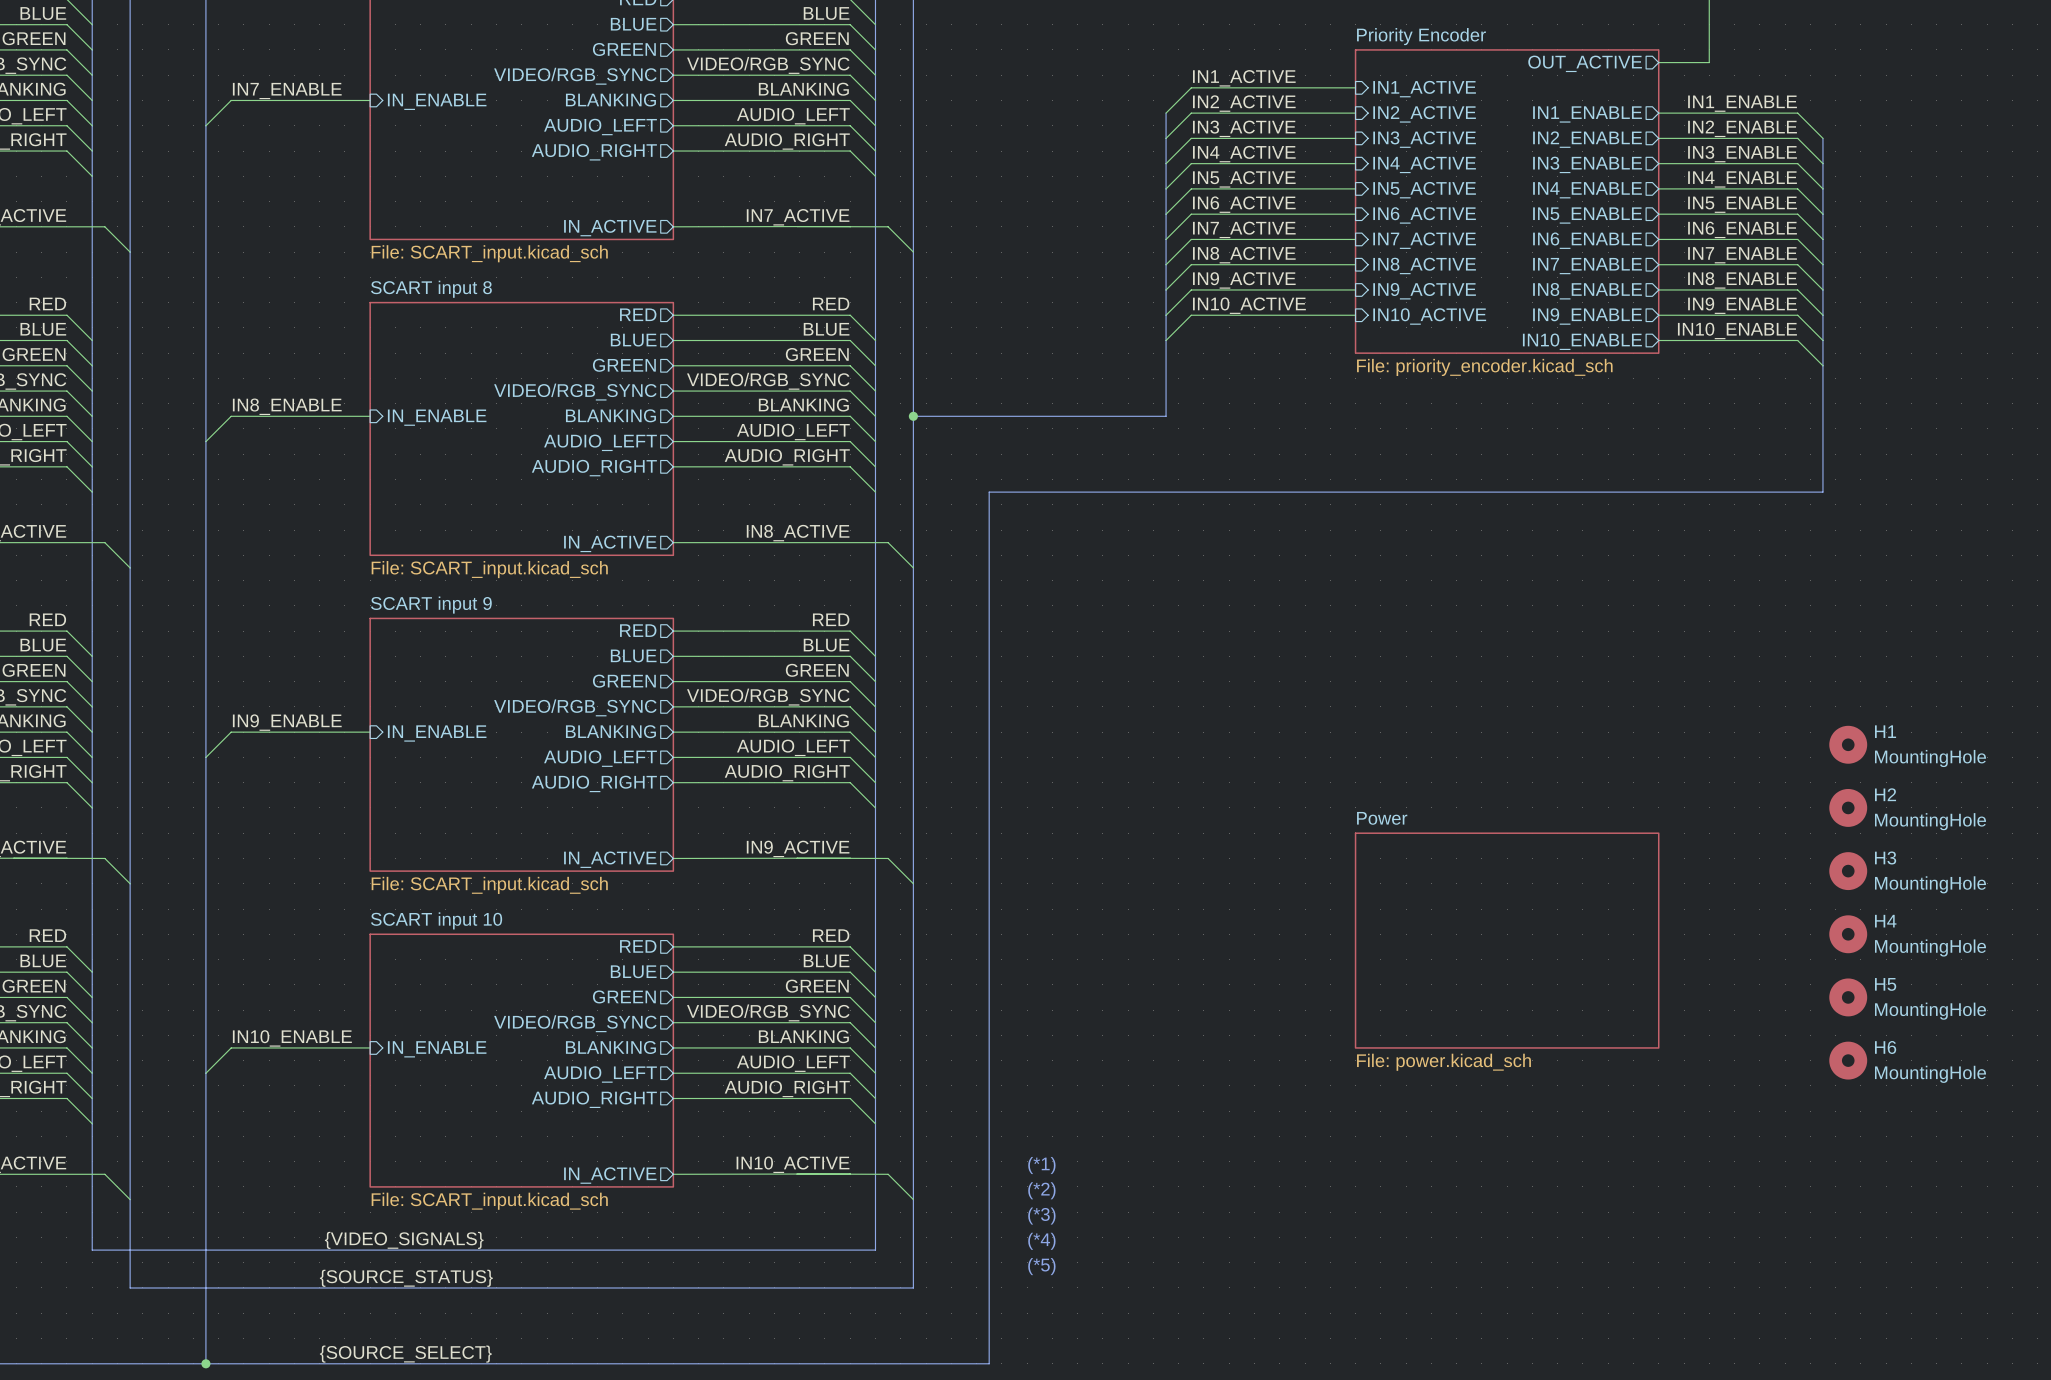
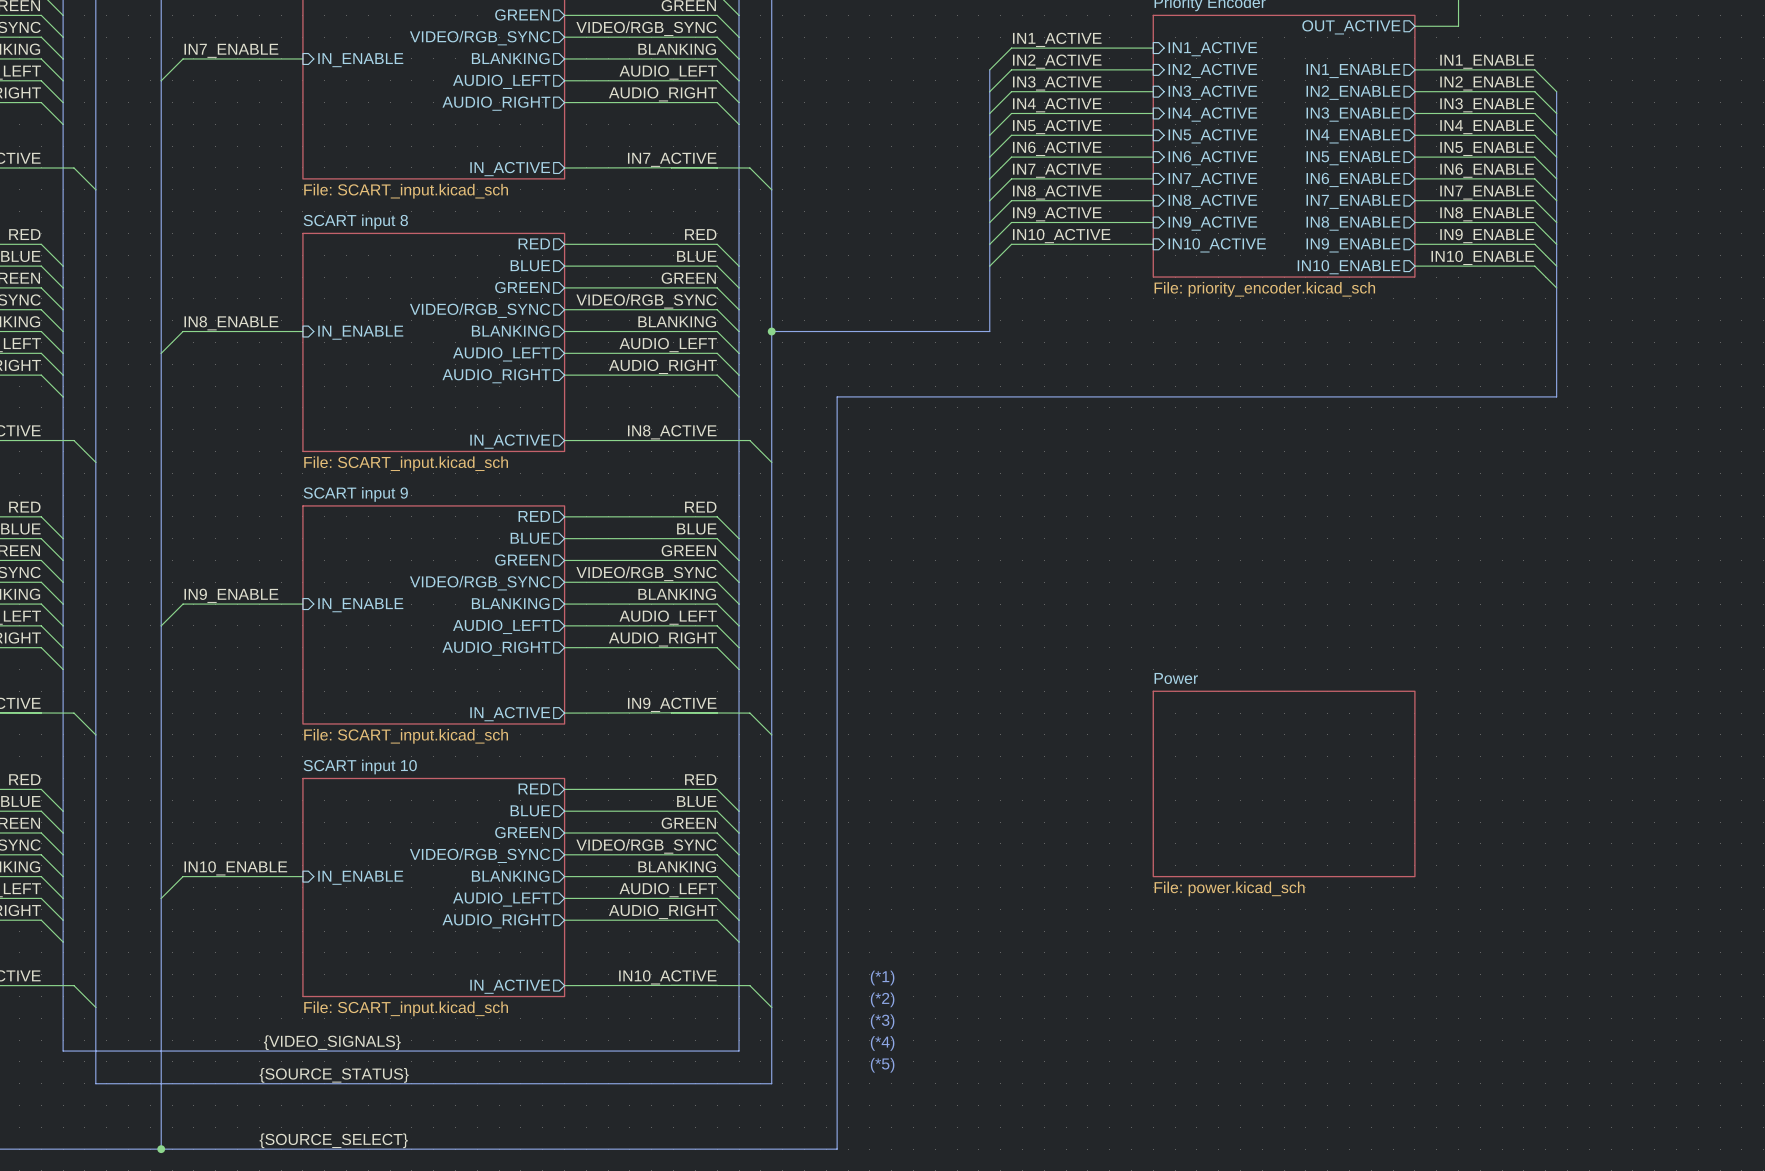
H1: MountingHole (1848, 744) -> none
H2: MountingHole (1848, 807) -> none
H3: MountingHole (1848, 871) -> none
H4: MountingHole (1848, 934) -> none
H5: MountingHole (1848, 997) -> none
H6: MountingHole (1848, 1060) -> none

